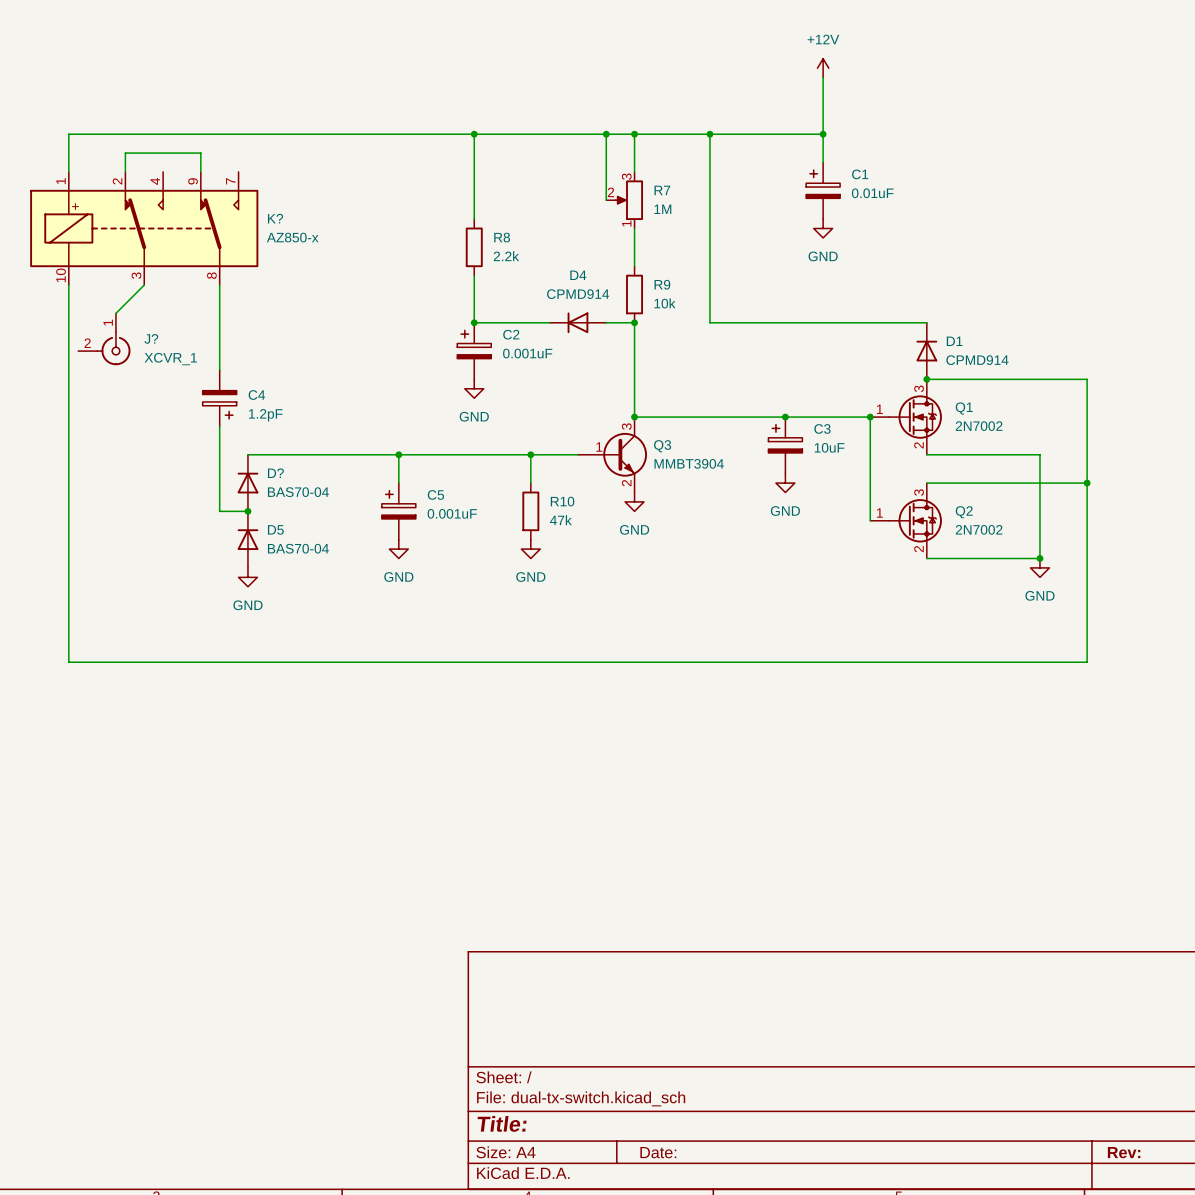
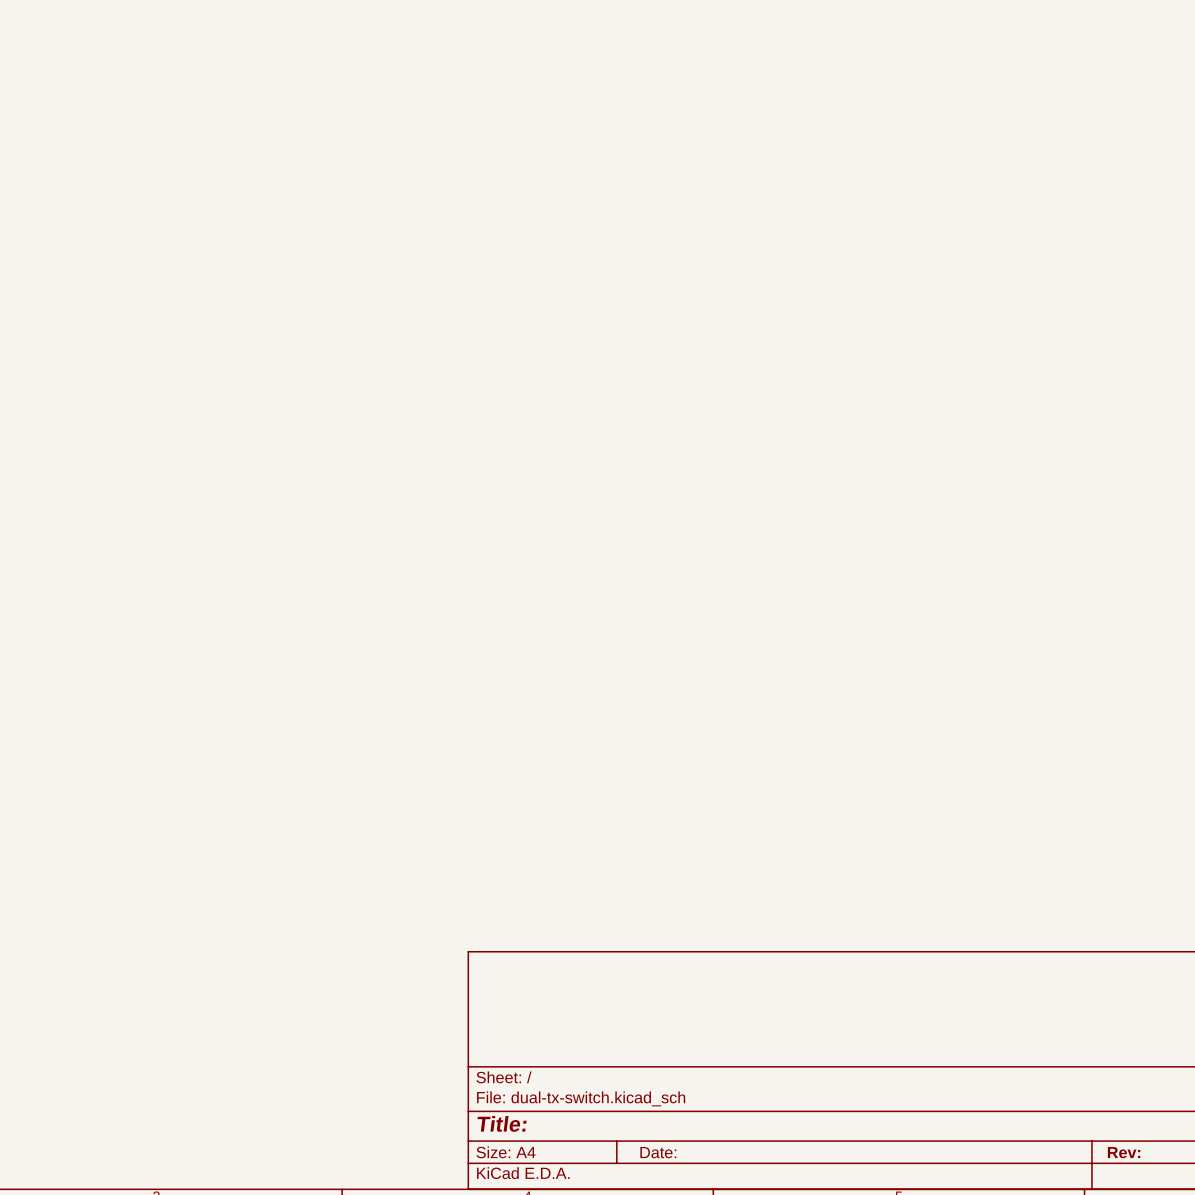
power symbol: +12V (823, 68) -> none
wire: (823, 77) (823, 162) -> none
wire: (474, 134) (474, 219) -> none
junction: (474, 134) -> none
wire: (606, 134) (606, 200) -> none
junction: (606, 134) -> none
wire: (634, 134) (634, 171) -> none
junction: (634, 134) -> none
wire: (709, 134) (709, 322) (926, 322) -> none
junction: (709, 134) -> none
wire: (823, 134) (68, 134) (68, 171) -> none
junction: (823, 134) -> none
wire: (125, 171) (125, 153) (200, 153) (200, 171) -> none
C1: 0.01uF (823, 190) -> none
R7: 1M (624, 200) -> none
K?: AZ850-x (144, 228) -> none
wire: (634, 228) (634, 266) -> none
power symbol: GND (823, 228) -> none
R8: 2.2k (474, 247) -> none
wire: (474, 275) (474, 322) (549, 322) -> none
wire: (68, 285) (68, 662) (1087, 662) (1087, 379) (926, 379) -> none
wire: (144, 285) (115, 313) -> none
wire: (219, 285) (219, 369) -> none
R9: 10k (634, 294) -> none
junction: (474, 322) -> none
D4: CPMD914 (577, 322) -> none
wire: (606, 322) (634, 322) (634, 417) (870, 417) (870, 520) -> none
junction: (634, 322) -> none
J?: XCVR_1 (104, 339) -> none
C2: 0.001uF (474, 351) -> none
D1: CPMD914 (926, 351) -> none
junction: (926, 379) -> none
power symbol: GND (474, 388) -> none
C4: 1.2pF (219, 398) -> none
junction: (634, 417) -> none
junction: (785, 417) -> none
junction: (870, 417) -> none
Q1: 2N7002 (906, 417) -> none
wire: (219, 426) (219, 511) (247, 511) -> none
C3: 10uF (785, 445) -> none
wire: (247, 454) (577, 454) -> none
wire: (398, 454) (398, 483) -> none
junction: (398, 454) -> none
wire: (530, 454) (530, 483) -> none
junction: (530, 454) -> none
Q3: MMBT3904 (612, 454) -> none
wire: (926, 454) (1039, 454) (1039, 558) (926, 558) -> none
D?: BAS70-04 (247, 483) -> none
power symbol: GND (785, 483) -> none
wire: (926, 483) (1087, 483) -> none
junction: (1087, 483) -> none
power symbol: GND (634, 501) -> none
junction: (247, 511) -> none
C5: 0.001uF (398, 511) -> none
R10: 47k (530, 511) -> none
Q2: 2N7002 (906, 520) -> none
D5: BAS70-04 (247, 539) -> none
power symbol: GND (398, 549) -> none
power symbol: GND (530, 549) -> none
junction: (1039, 558) -> none
power symbol: GND (1039, 567) -> none
power symbol: GND (247, 577) -> none

